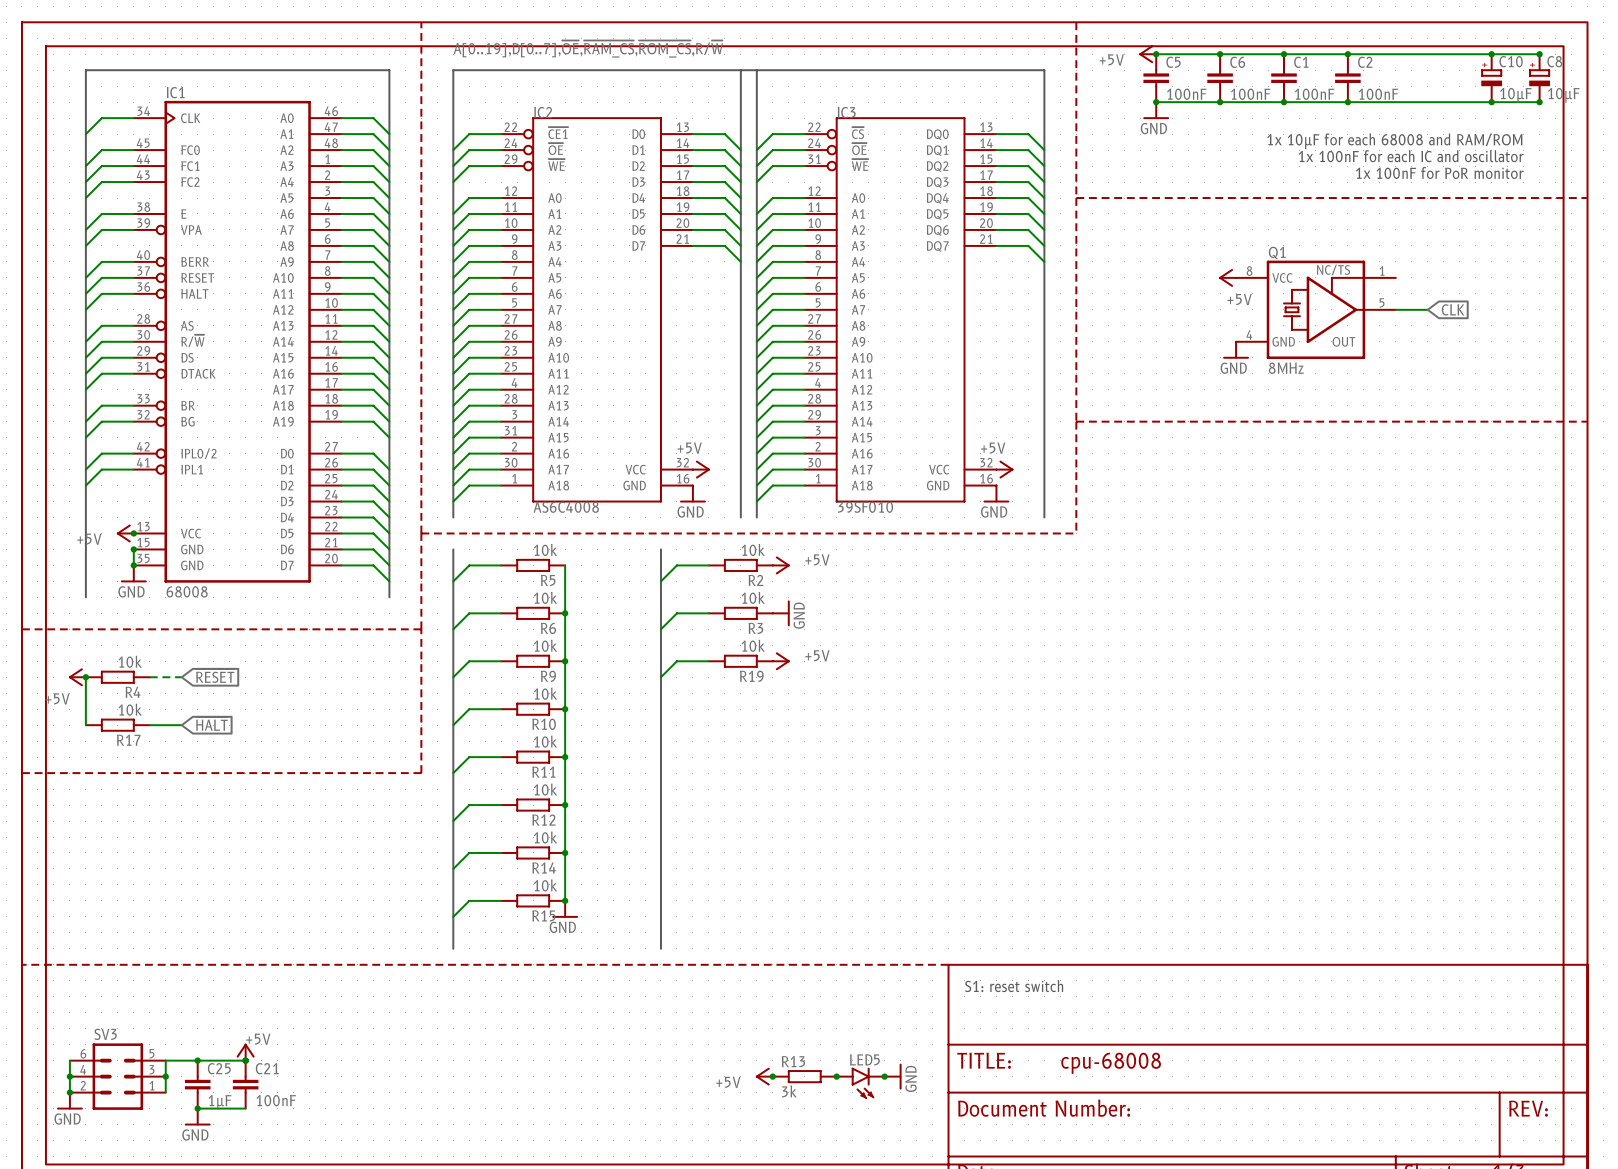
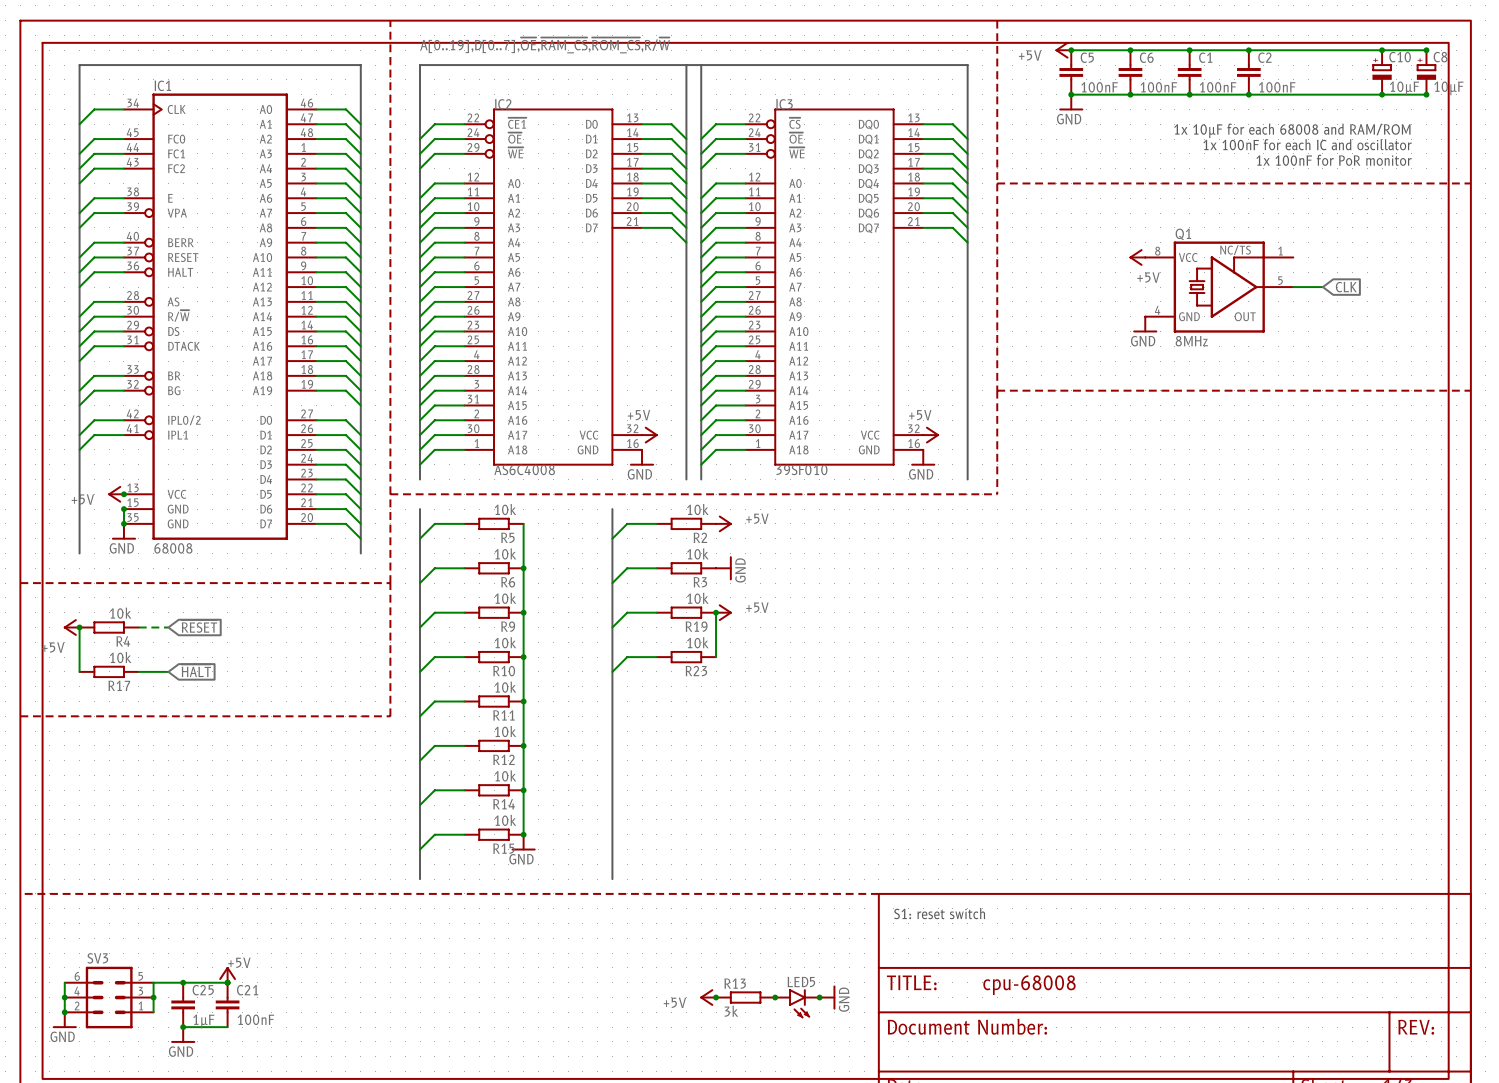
wire: none -> (716, 612) (716, 657)
junction: none -> (716, 612)
wire: none -> (656, 657) (627, 657) (612, 671)
R23: none -> 10k (686, 657)

